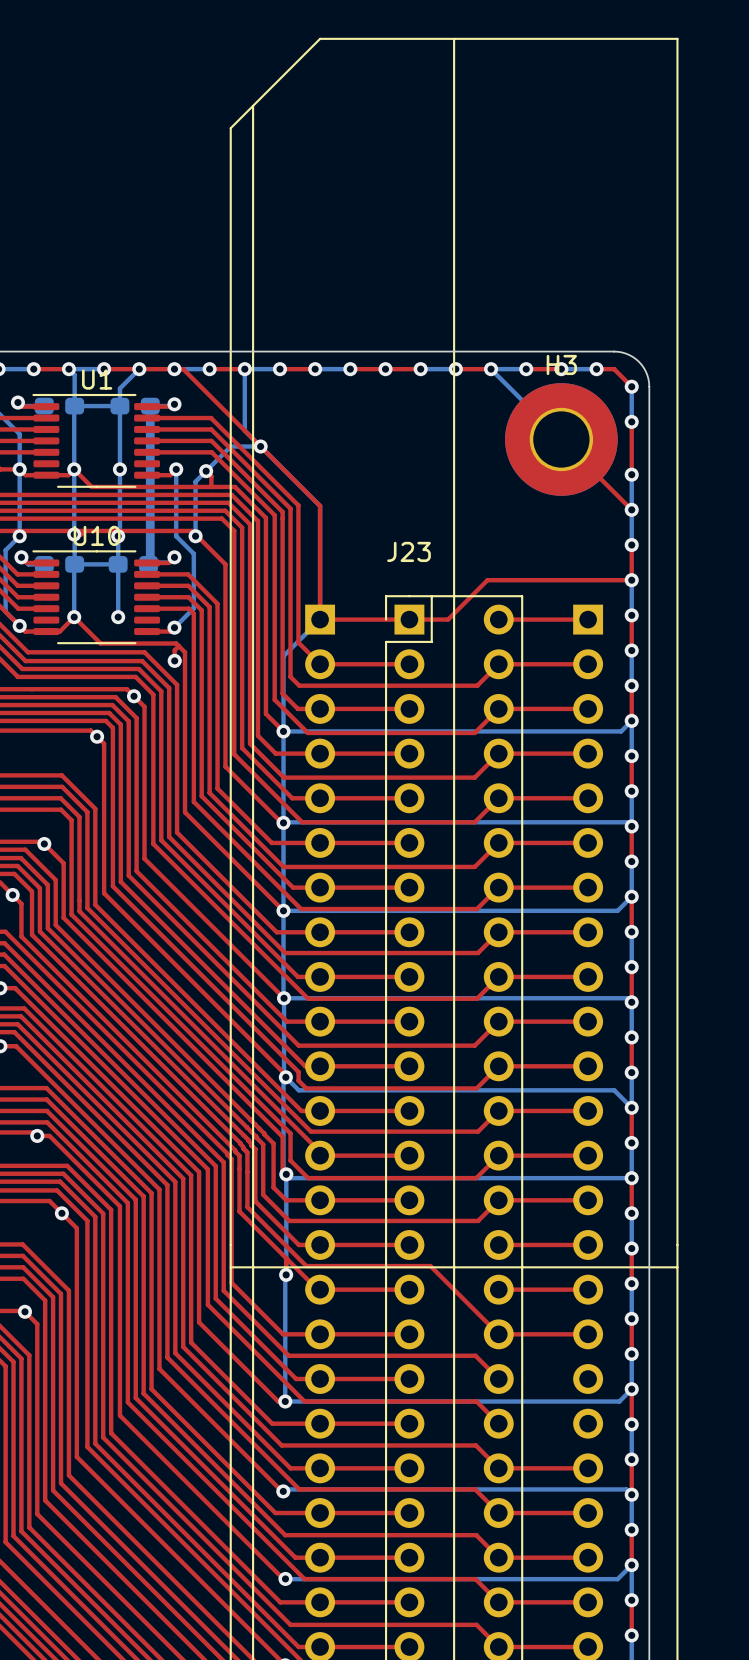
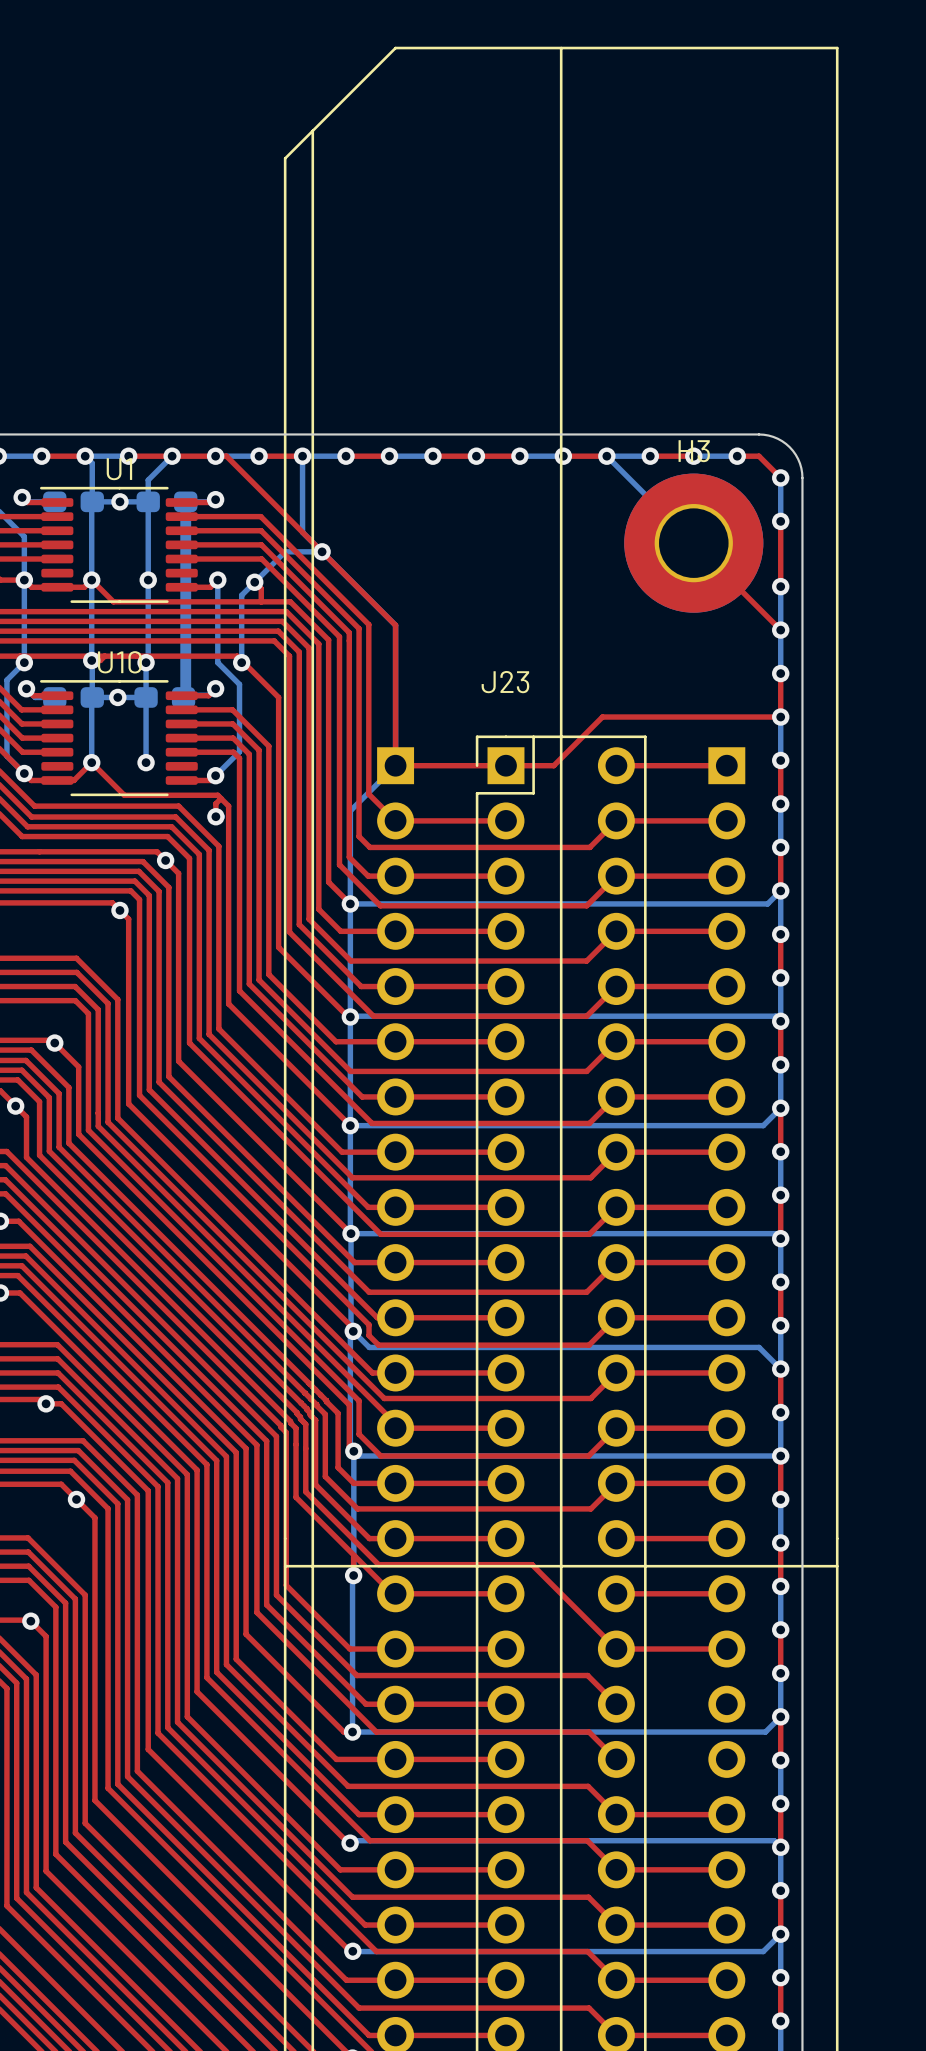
via: none -> (119, 501)
via: none -> (117, 697)

